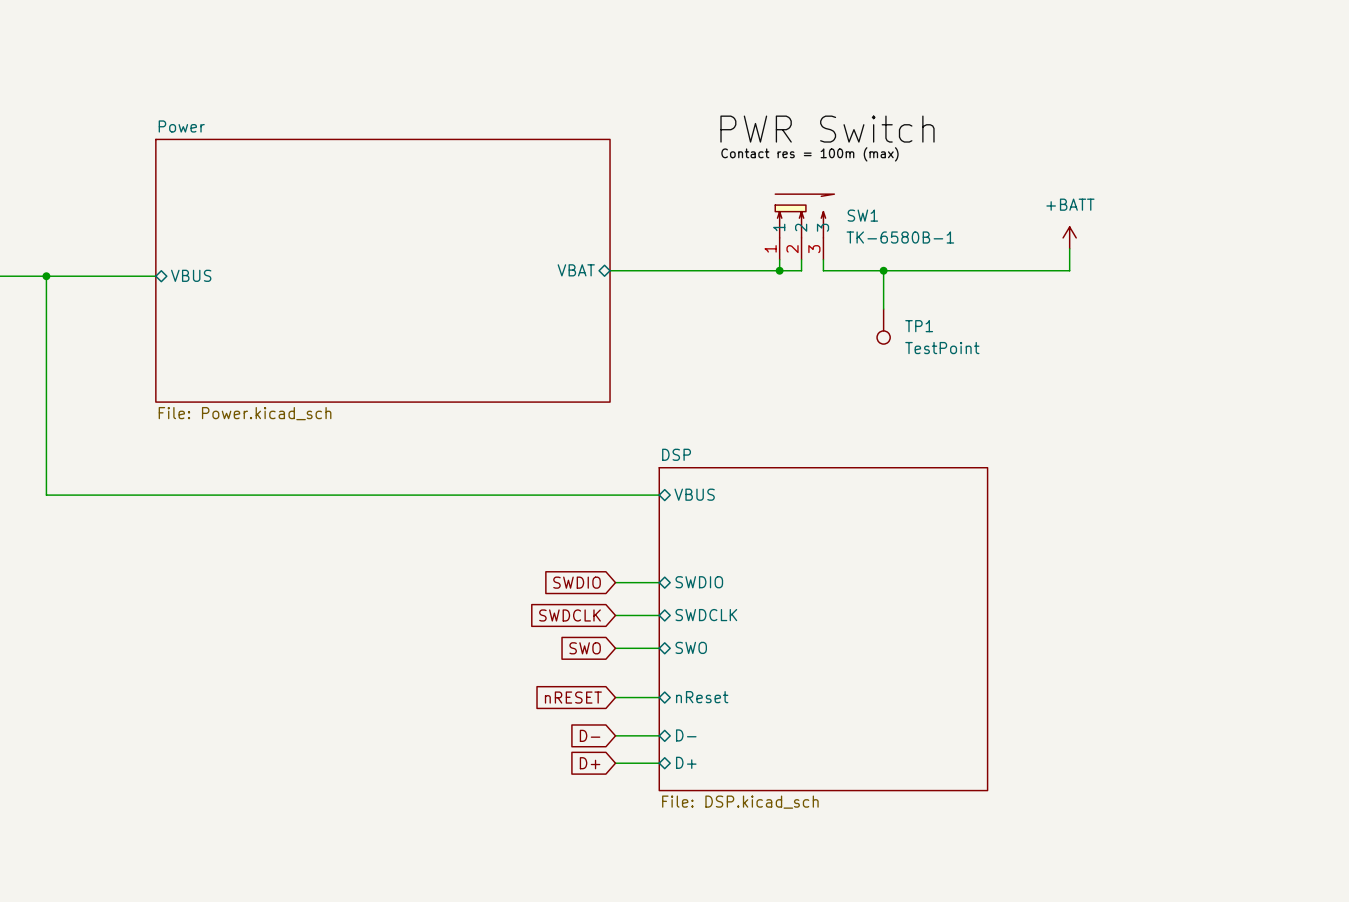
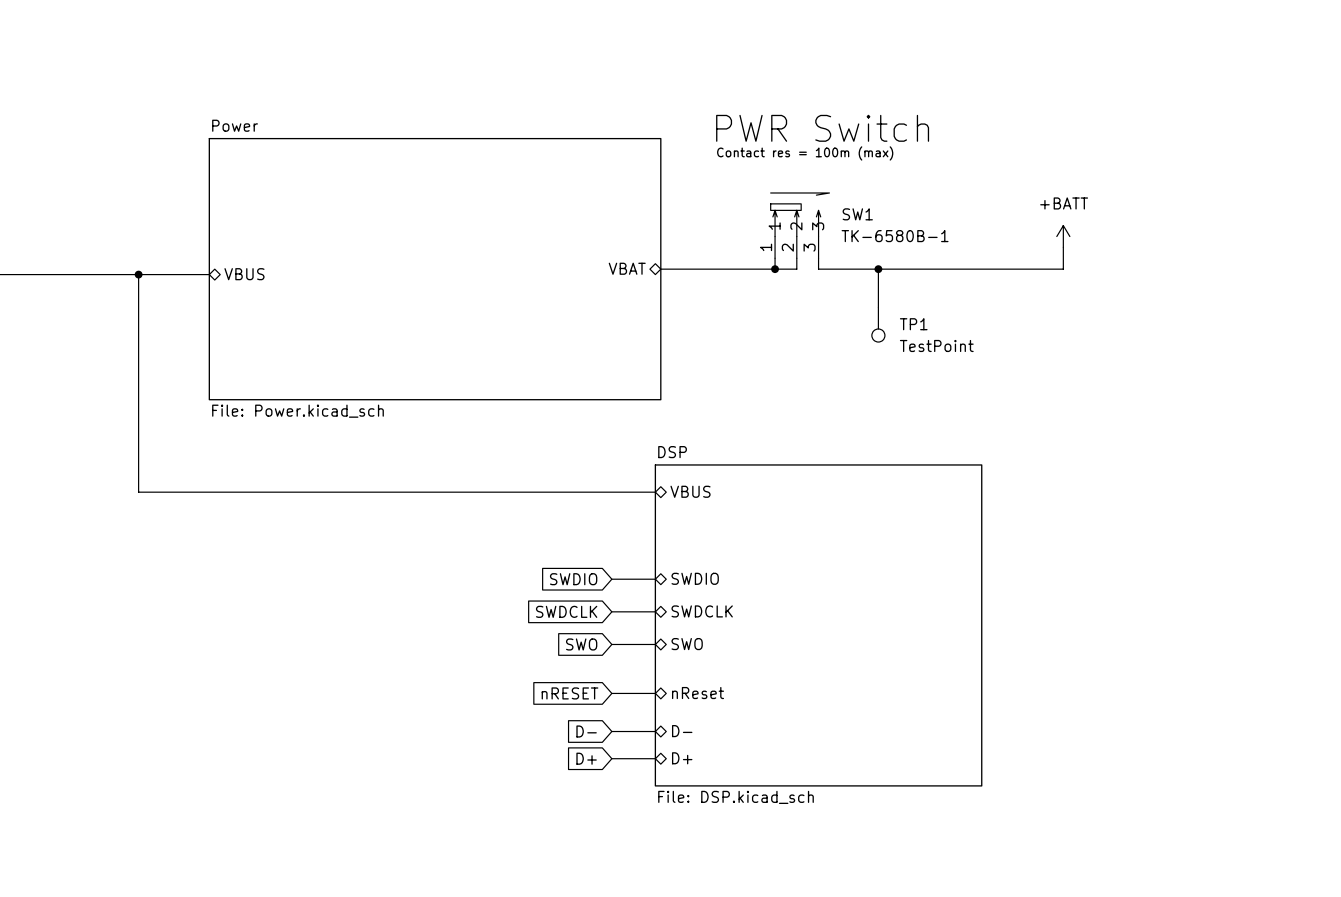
sheet Power position: (382, 270) -> (435, 269)
sheet pin position: VBAT (576, 270) -> VBAT (627, 268)
wire: (610, 270) (664, 270) -> none
sheet pin position: VBUS (191, 275) -> VBUS (244, 274)
wire: (46, 276) (46, 495) (139, 495) -> (138, 274) (138, 492)
junction: (46, 276) -> none
junction: none -> (138, 274)
wire: none -> (154, 274) (209, 274)

